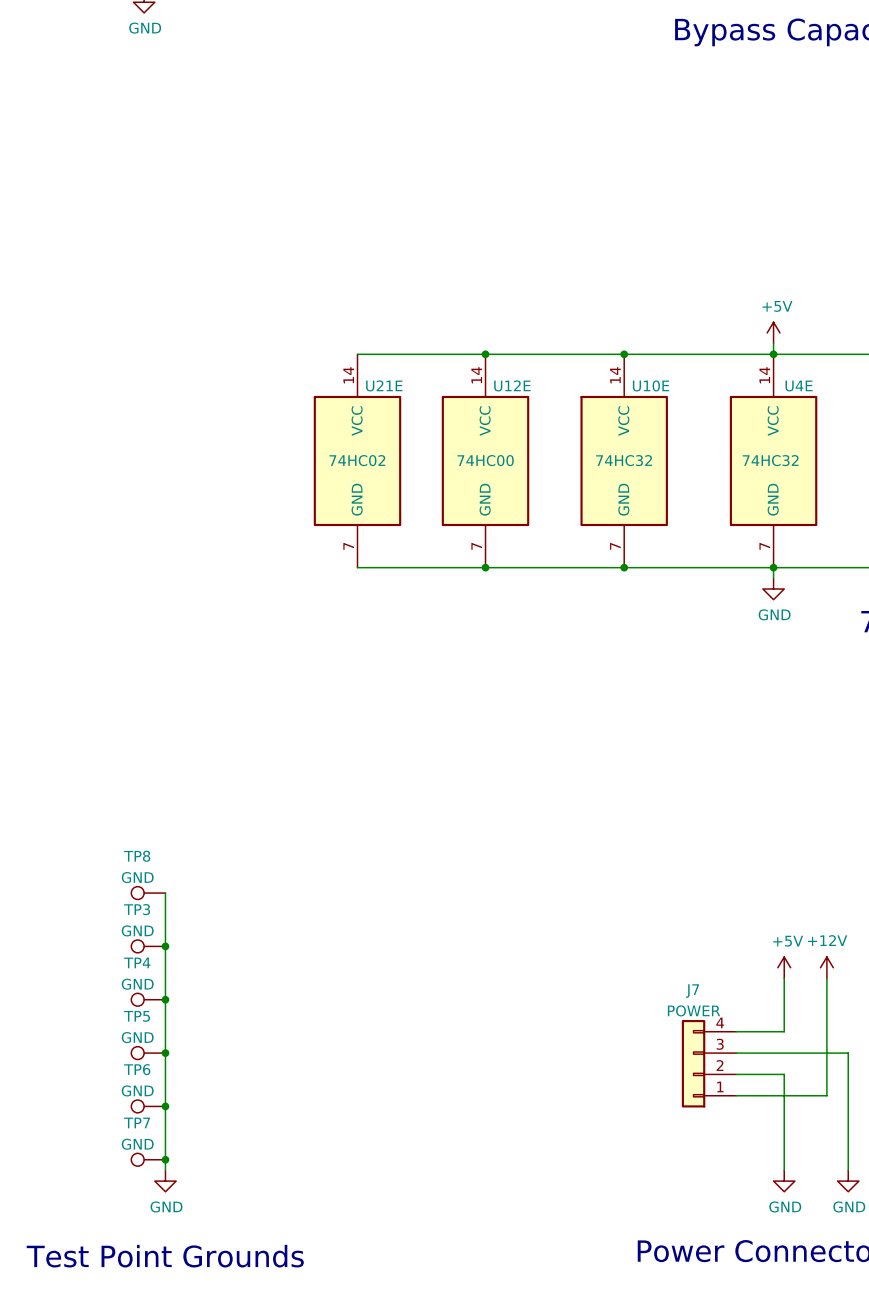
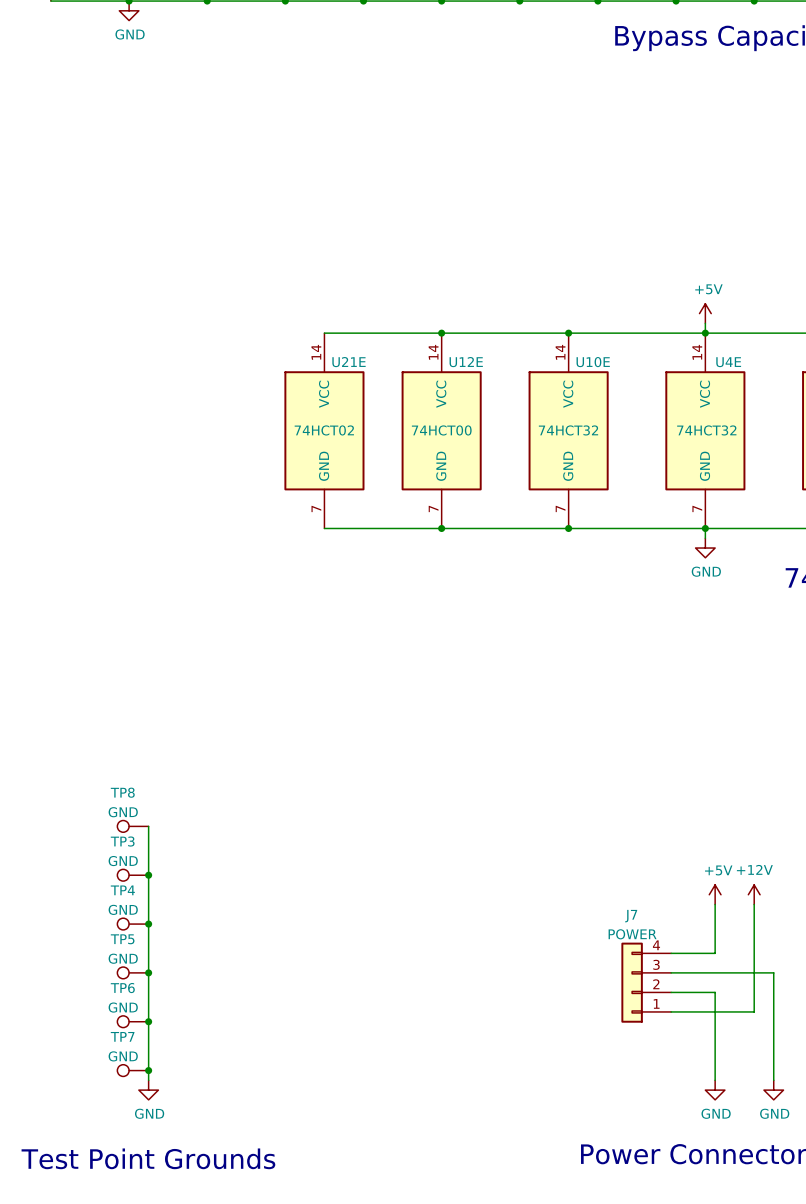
U21E value: 74HC02 (357, 460) -> 74HCT02 (324, 430)
U12E value: 74HC00 (485, 460) -> 74HCT00 (441, 430)
U10E value: 74HC32 (624, 460) -> 74HCT32 (568, 430)
U4E value: 74HC32 (770, 460) -> 74HCT32 (706, 430)

